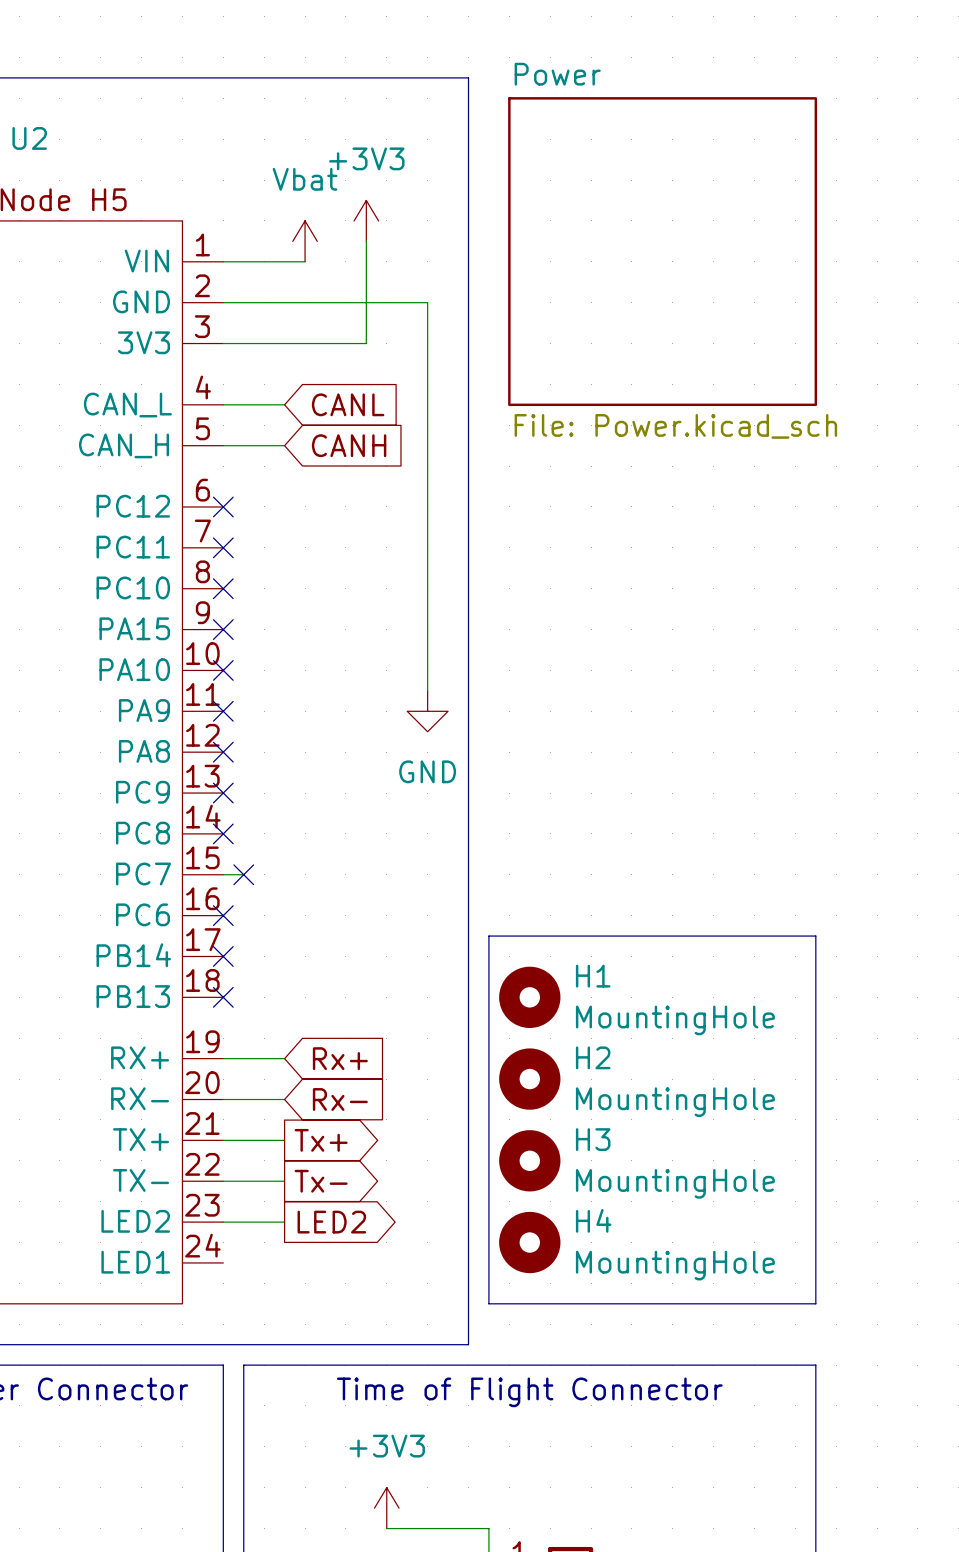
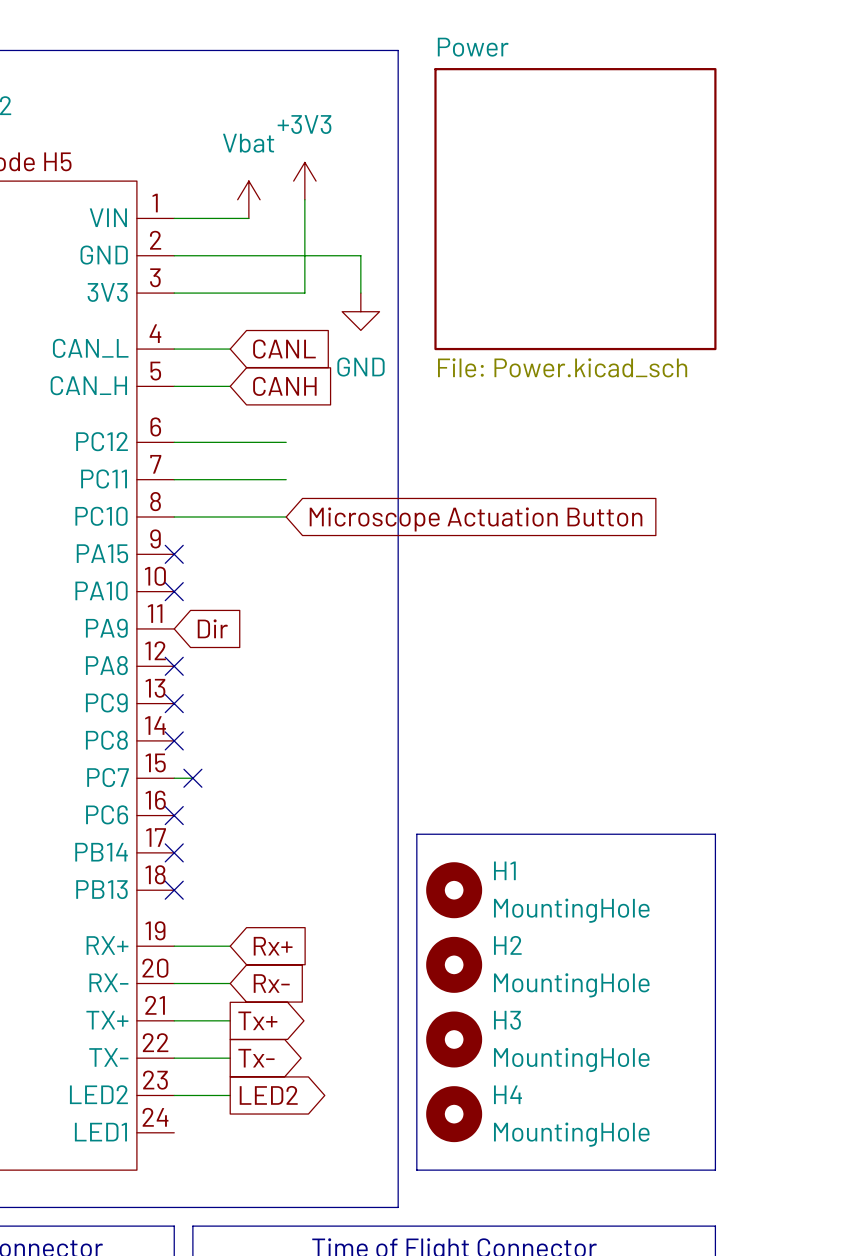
wire: (427, 343) (427, 690) -> none
wire: none -> (174, 442) (286, 442)
no-connect mark: (223, 506) -> none
wire: none -> (174, 479) (286, 479)
no-connect mark: (223, 547) -> none
wire: none -> (174, 516) (286, 516)
no-connect mark: (223, 588) -> none
global label: none -> Microscope Actuation Button (476, 519)
no-connect mark: (223, 711) -> none
global label: none -> Dir (212, 628)
power symbol position: GND (427, 711) -> GND (360, 311)

